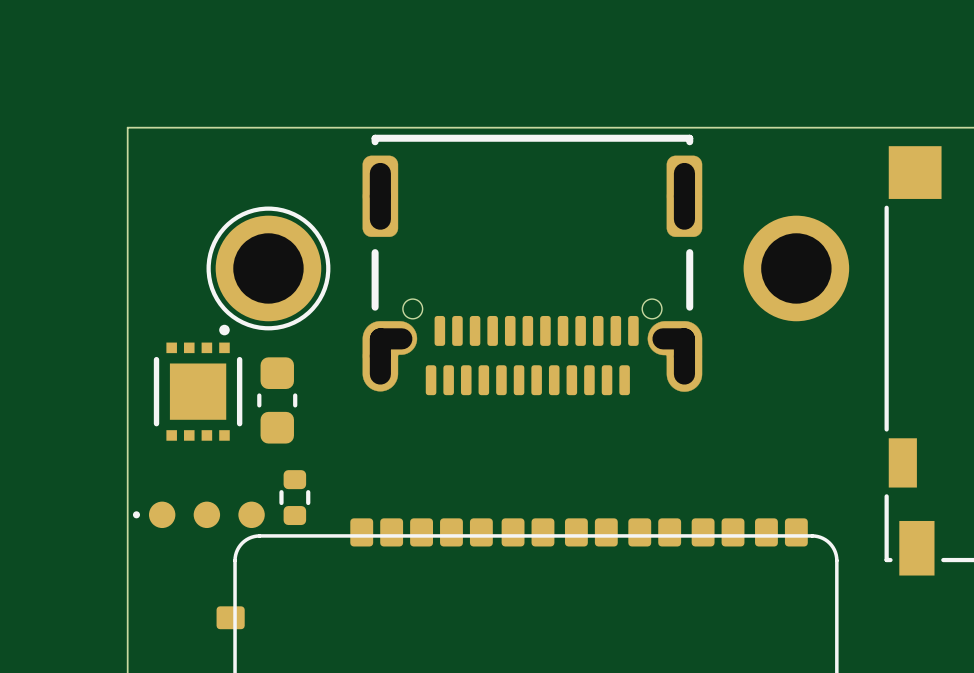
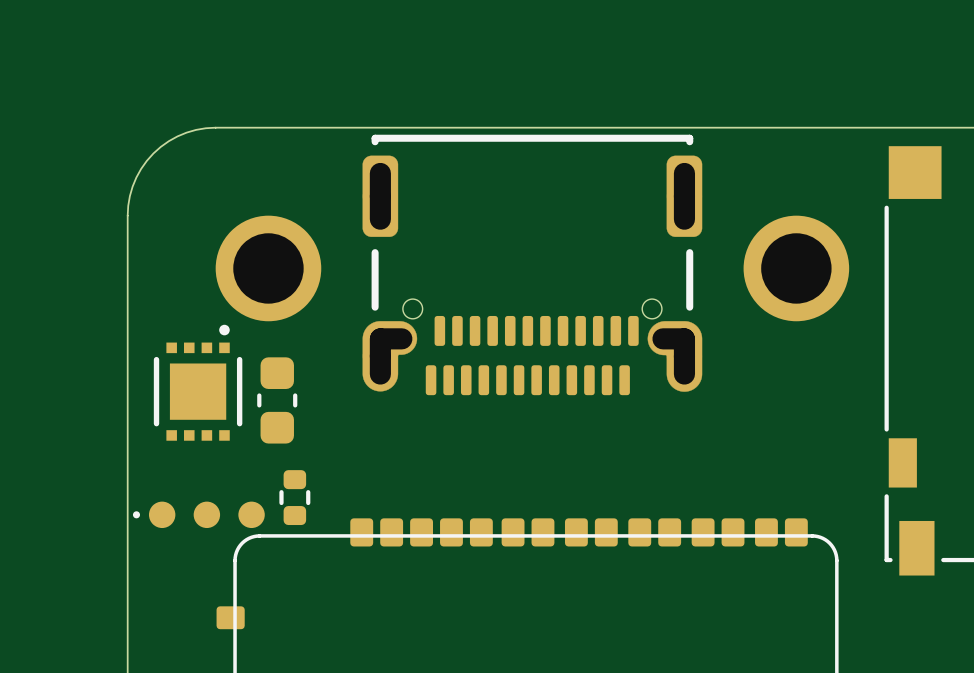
board edge: (215, 127) (127, 127) (127, 215) -> (215, 127) (186, 132) (168, 141) (153, 153) (141, 168) (132, 186) (127, 215)
part footprint: [206, 206, 331, 331] -> [215, 215, 322, 322]

